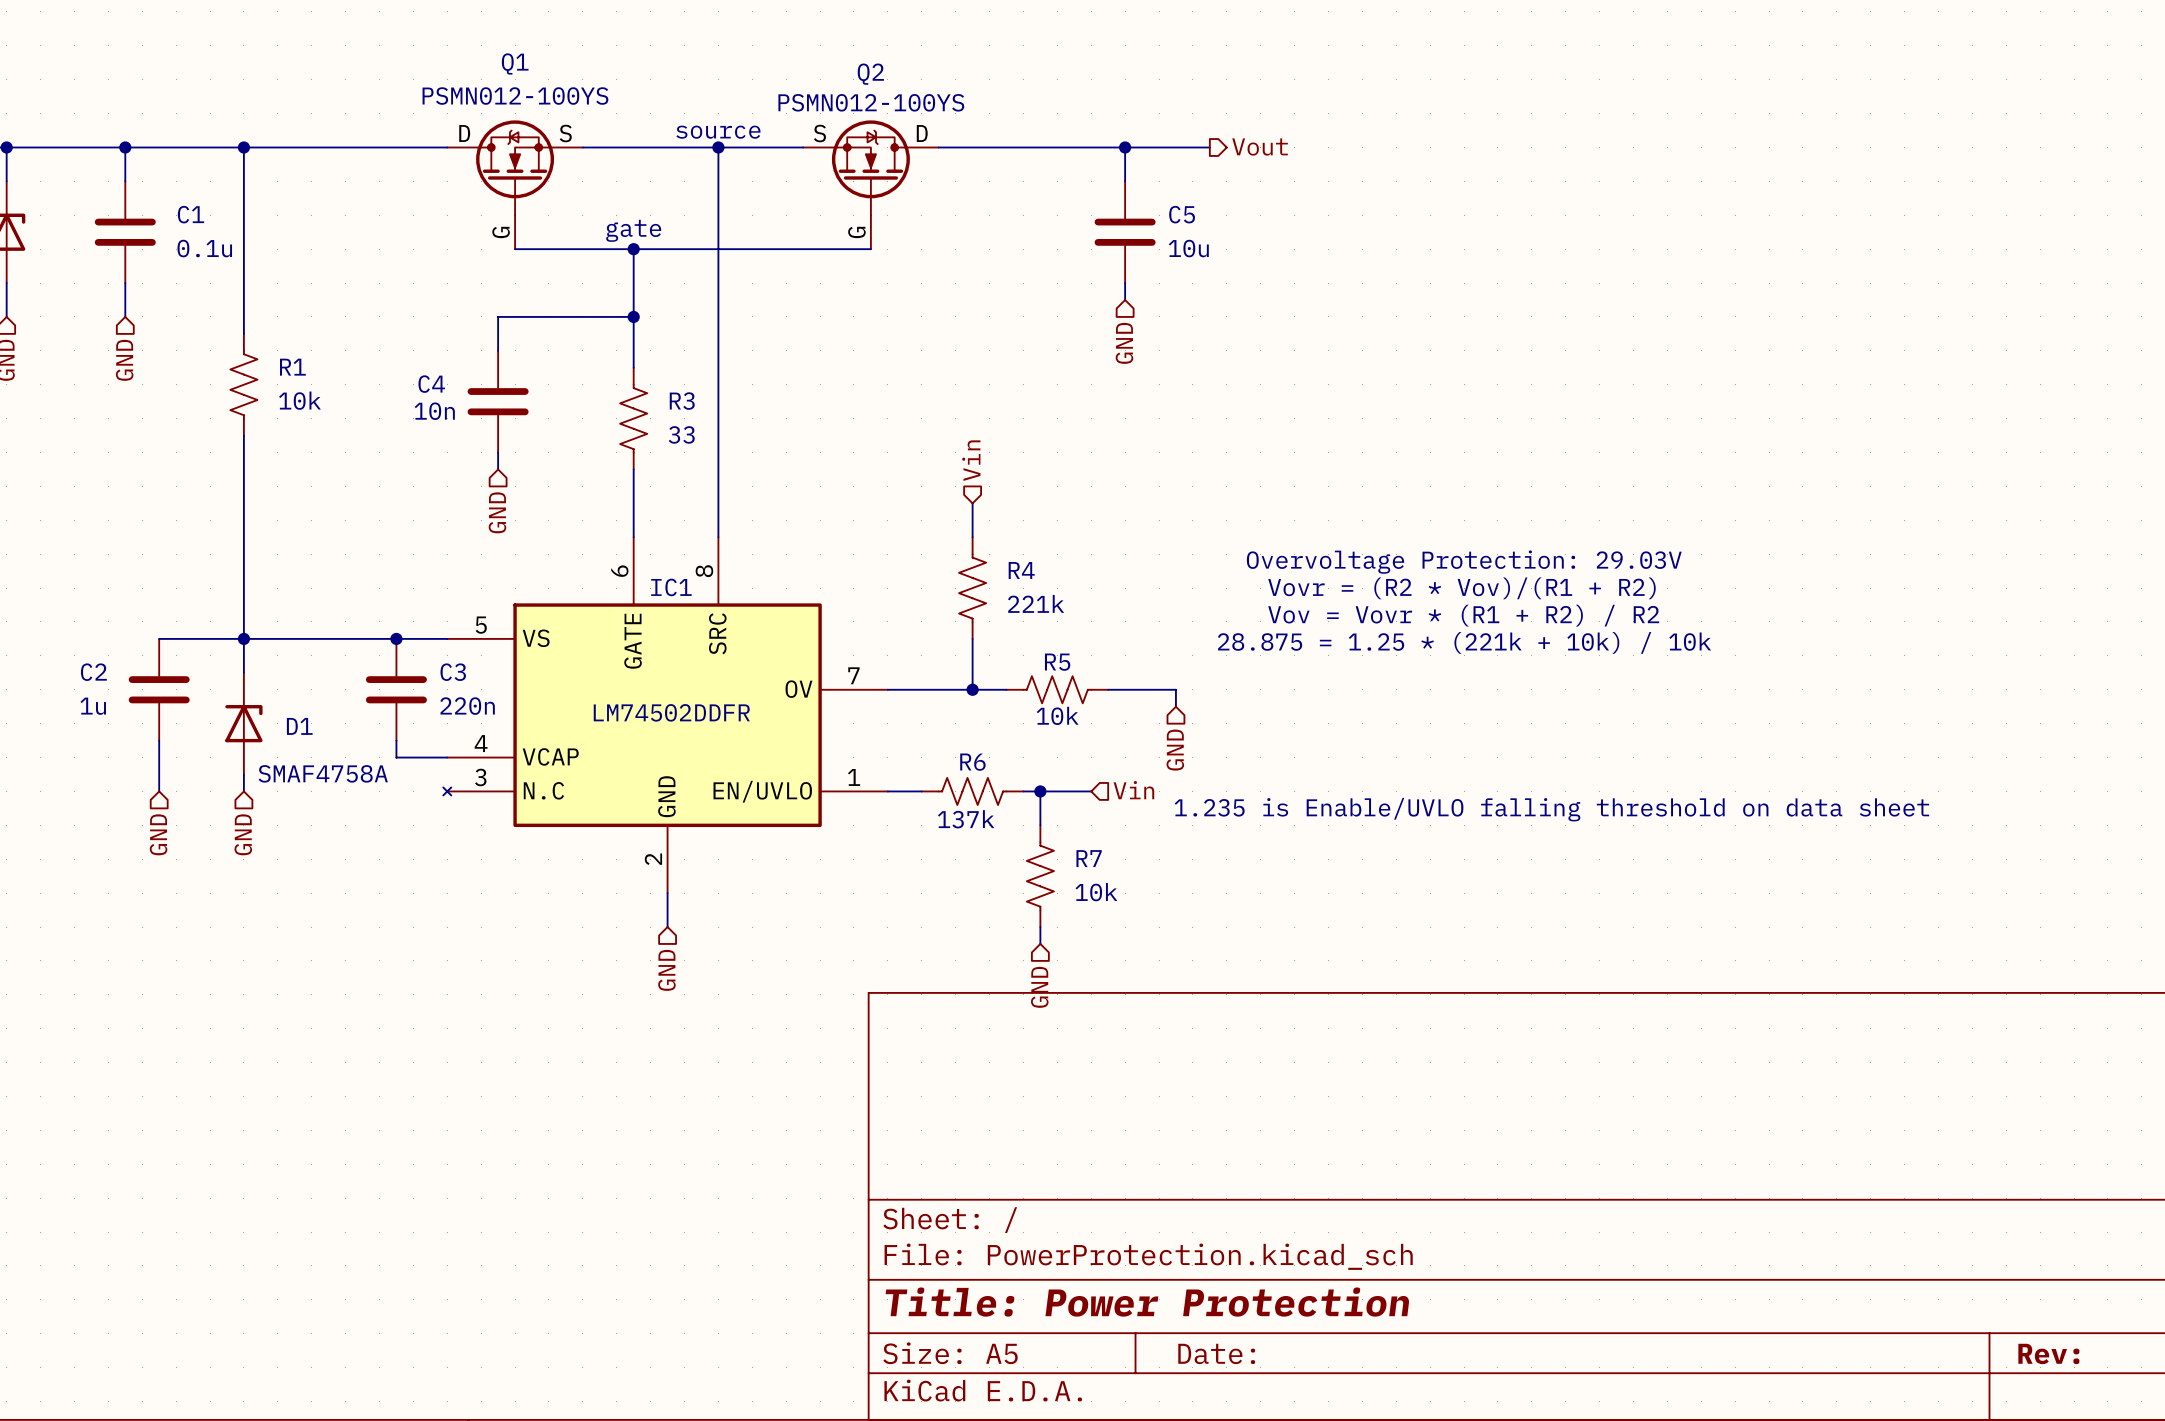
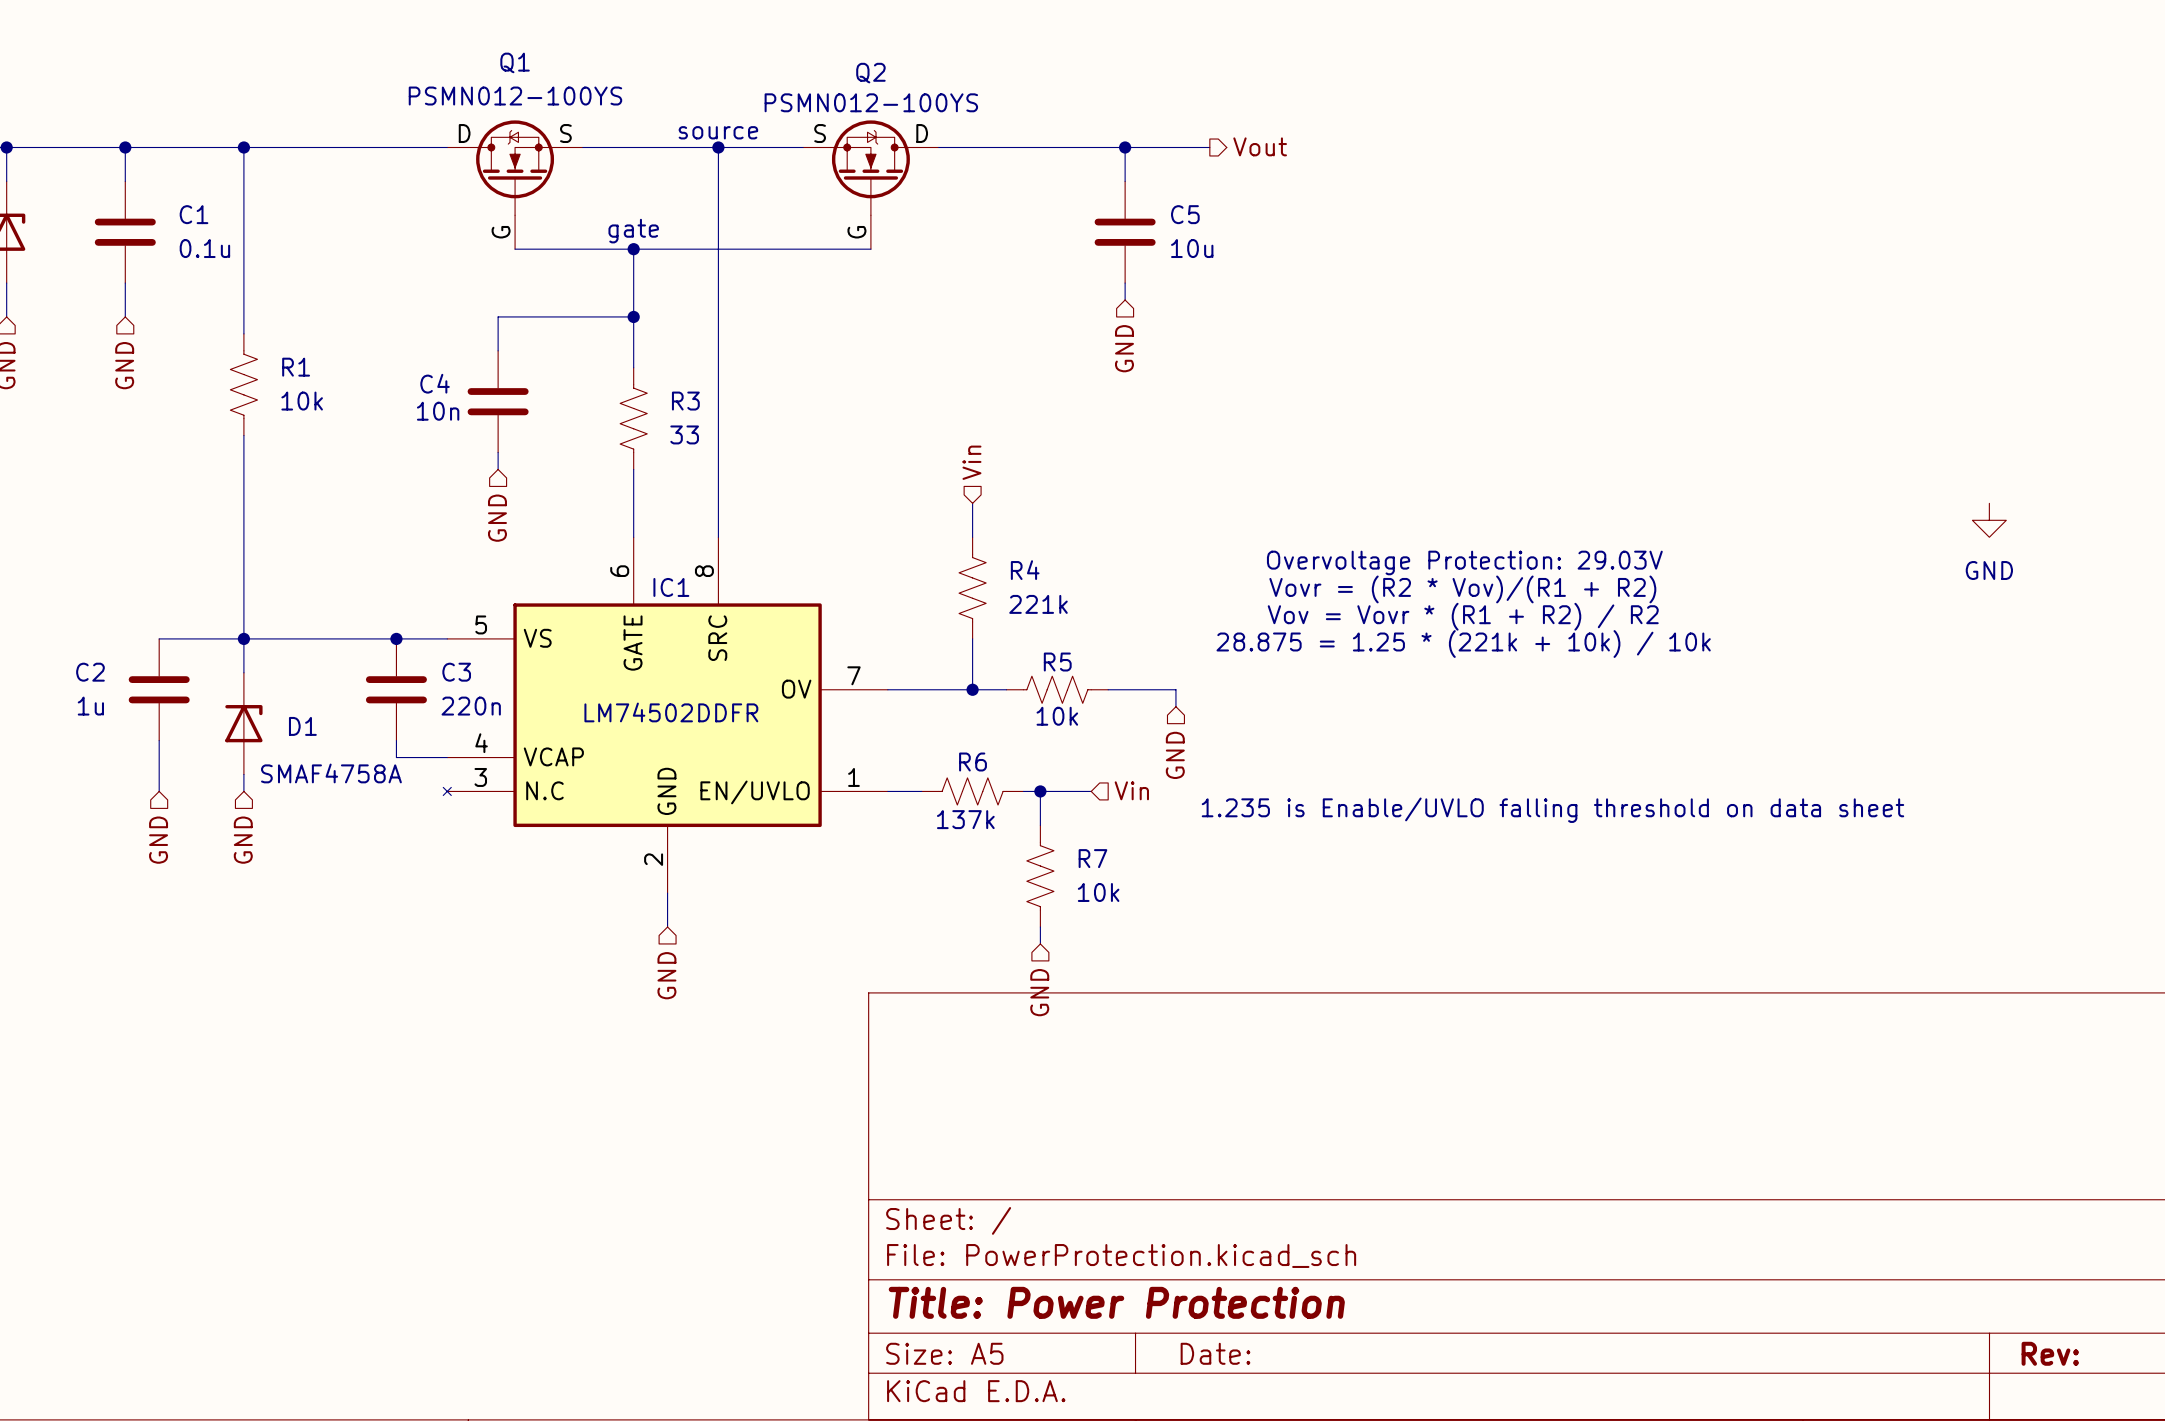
power symbol: none -> GND (1989, 520)

